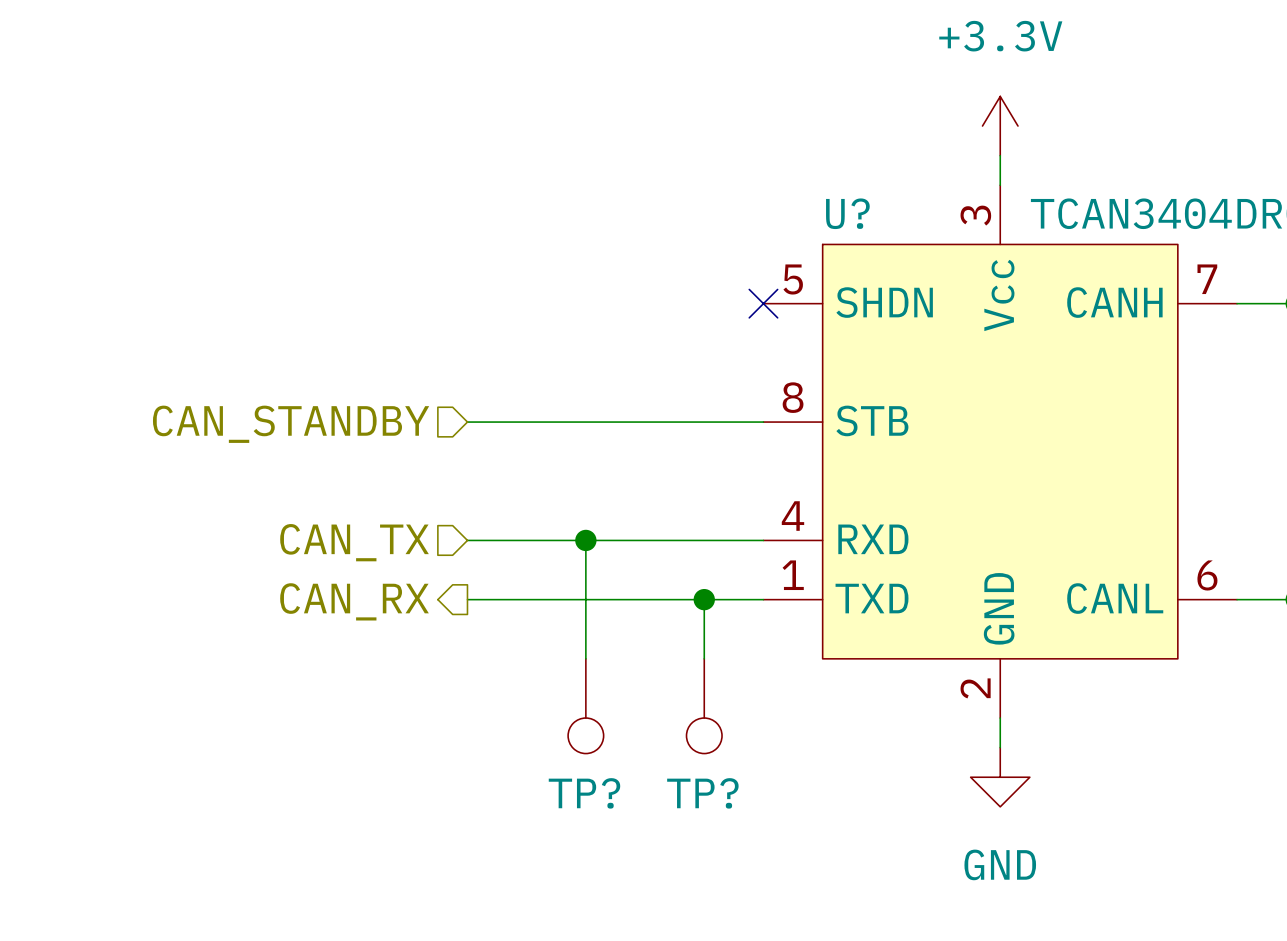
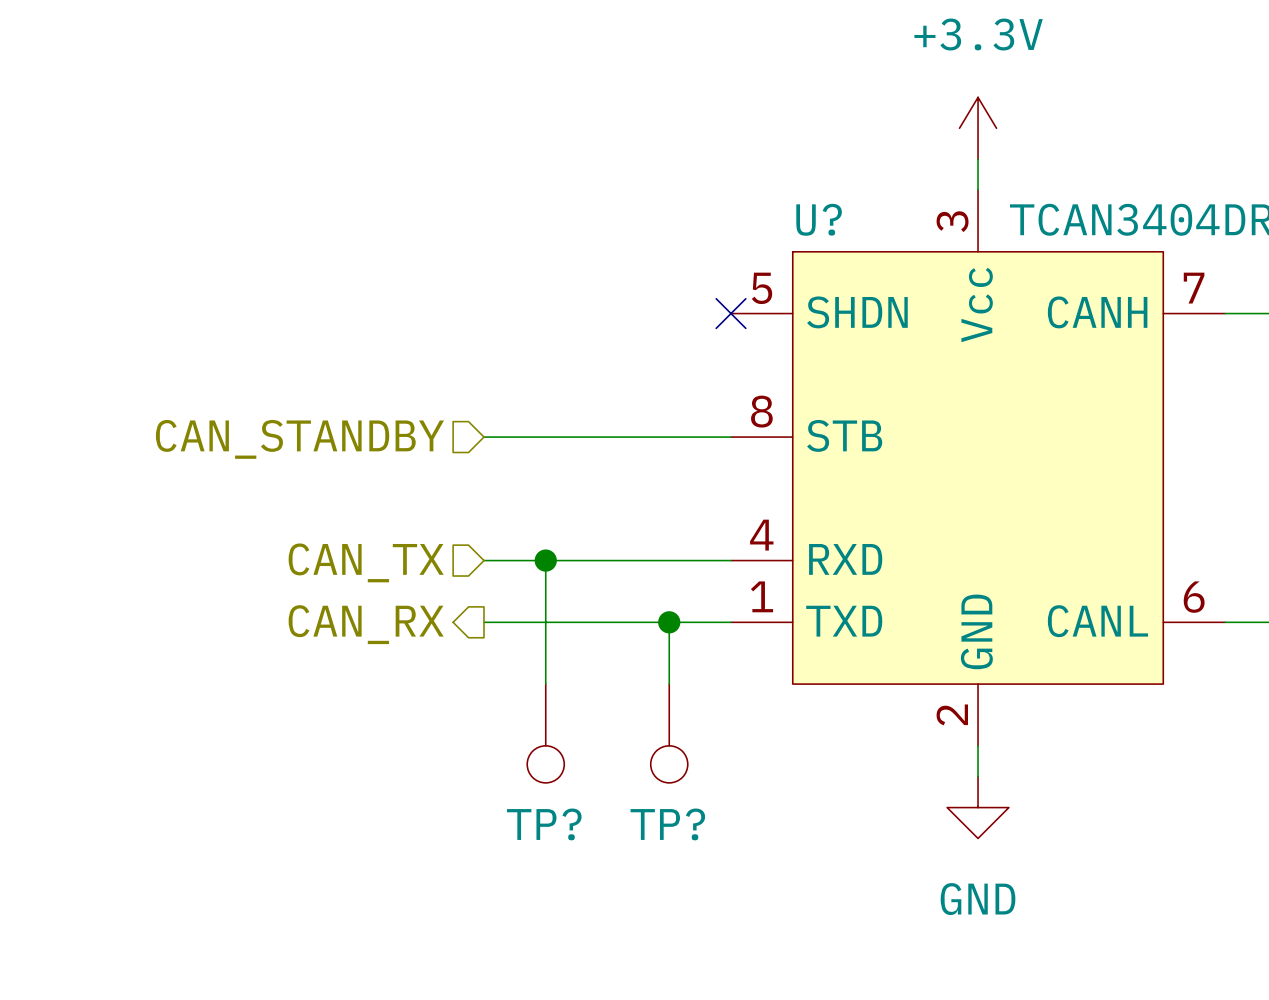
wire: (467, 422) (526, 422) -> none
hierarchical label position: CAN_STANDBY (291, 424) -> CAN_STANDBY (299, 439)
wire: (467, 540) (526, 540) -> none
hierarchical label position: CAN_TX (354, 542) -> CAN_TX (366, 562)
wire: (467, 599) (526, 599) -> none
hierarchical label position: CAN_RX (354, 601) -> CAN_RX (366, 624)

